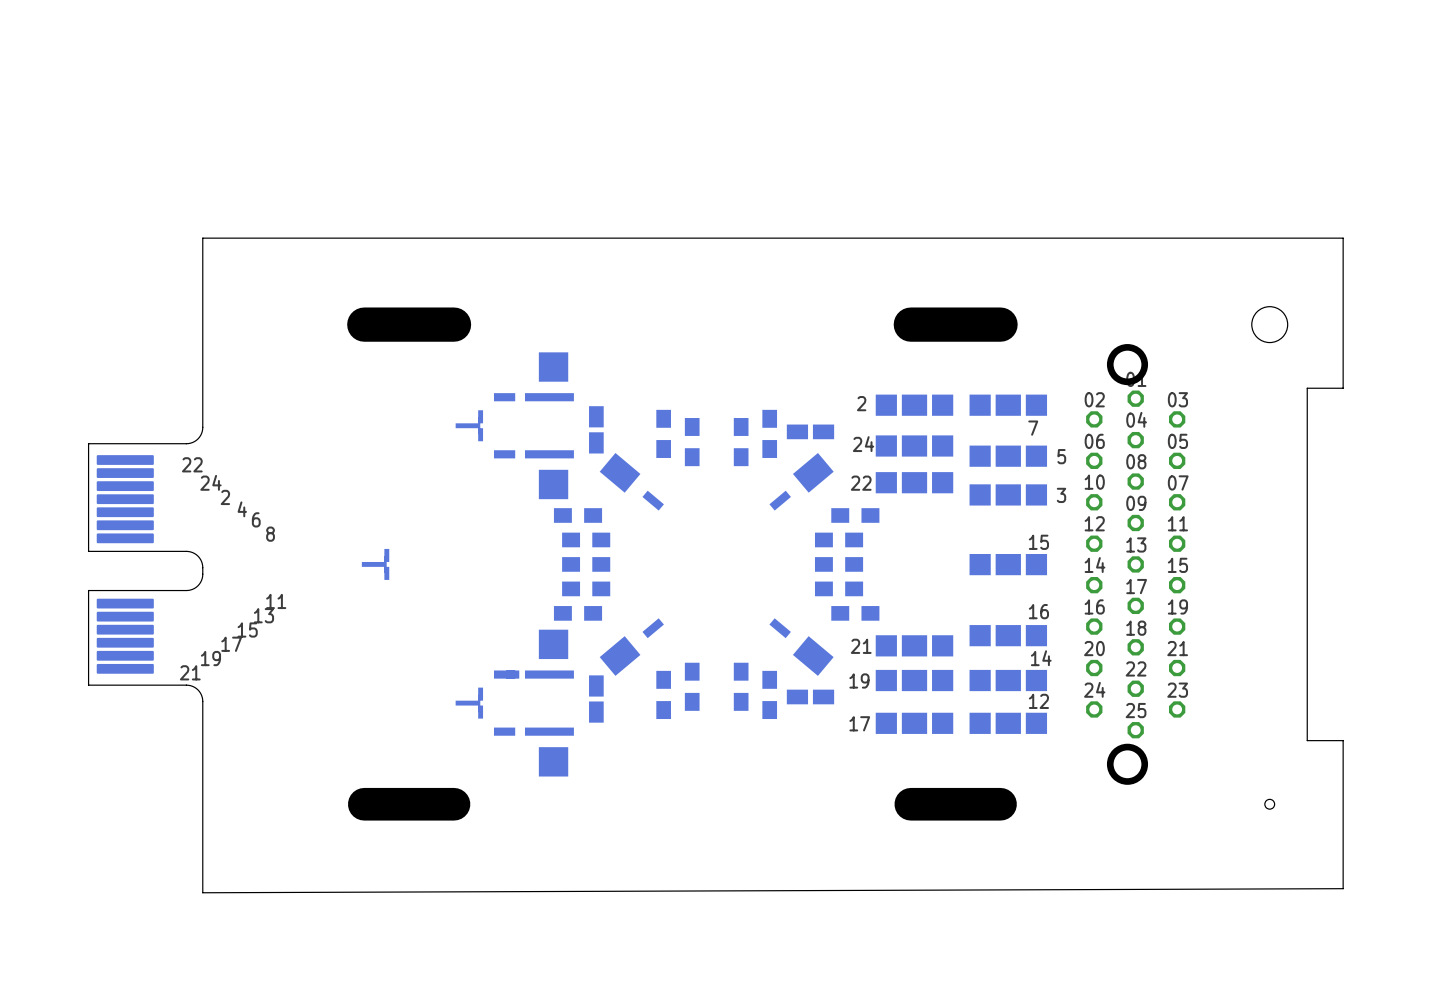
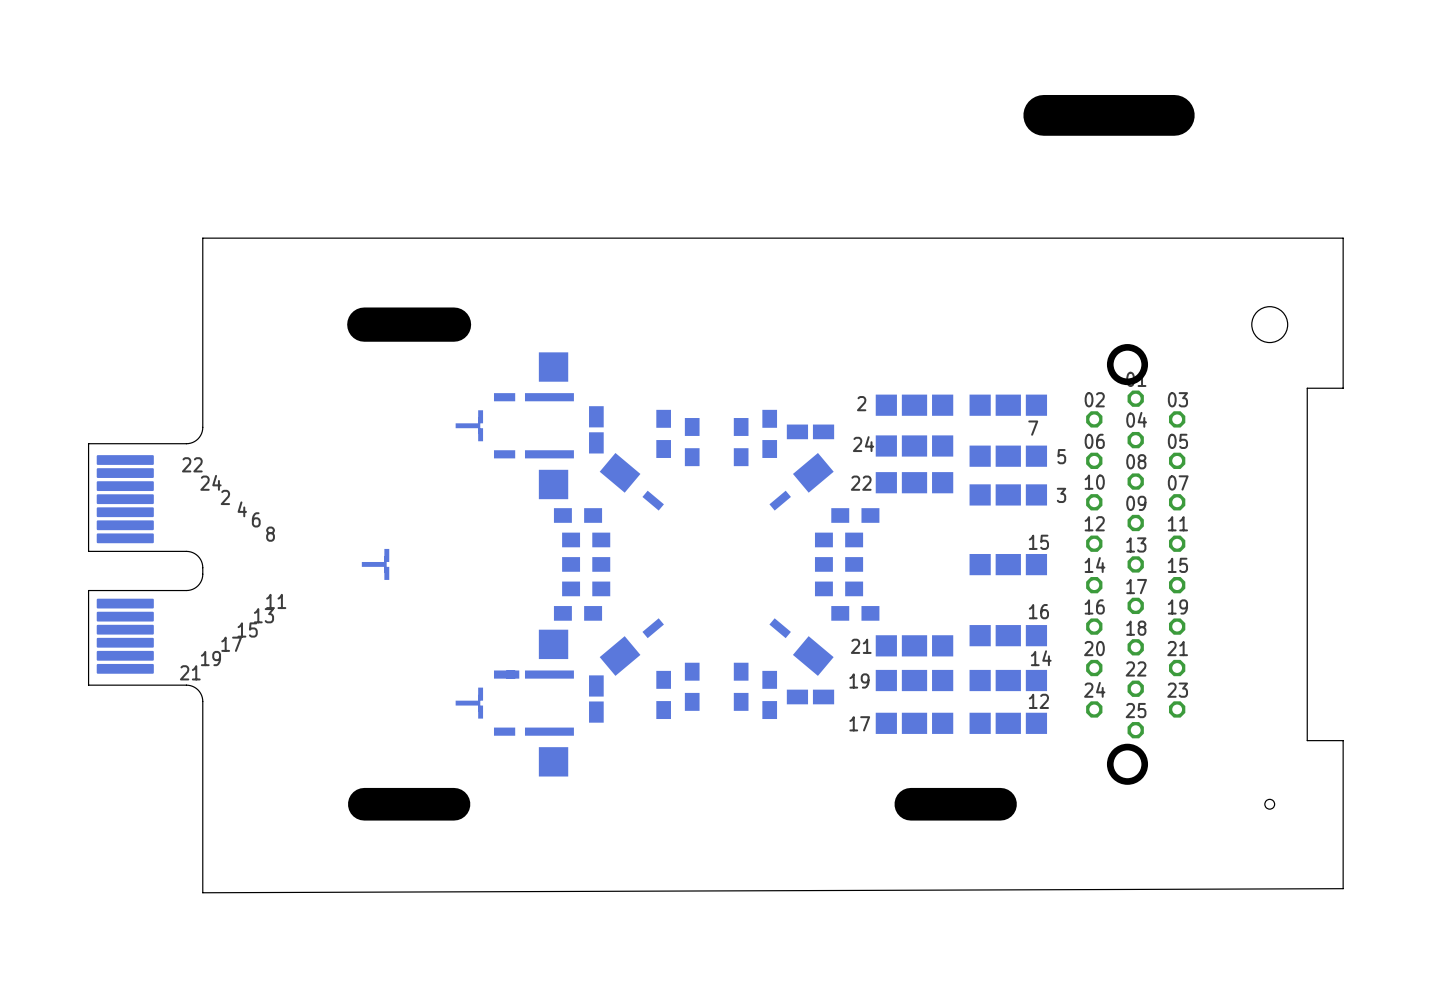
board edge: none -> (1174, 115) (1043, 115)
board edge: (1000, 324) (910, 324) -> none

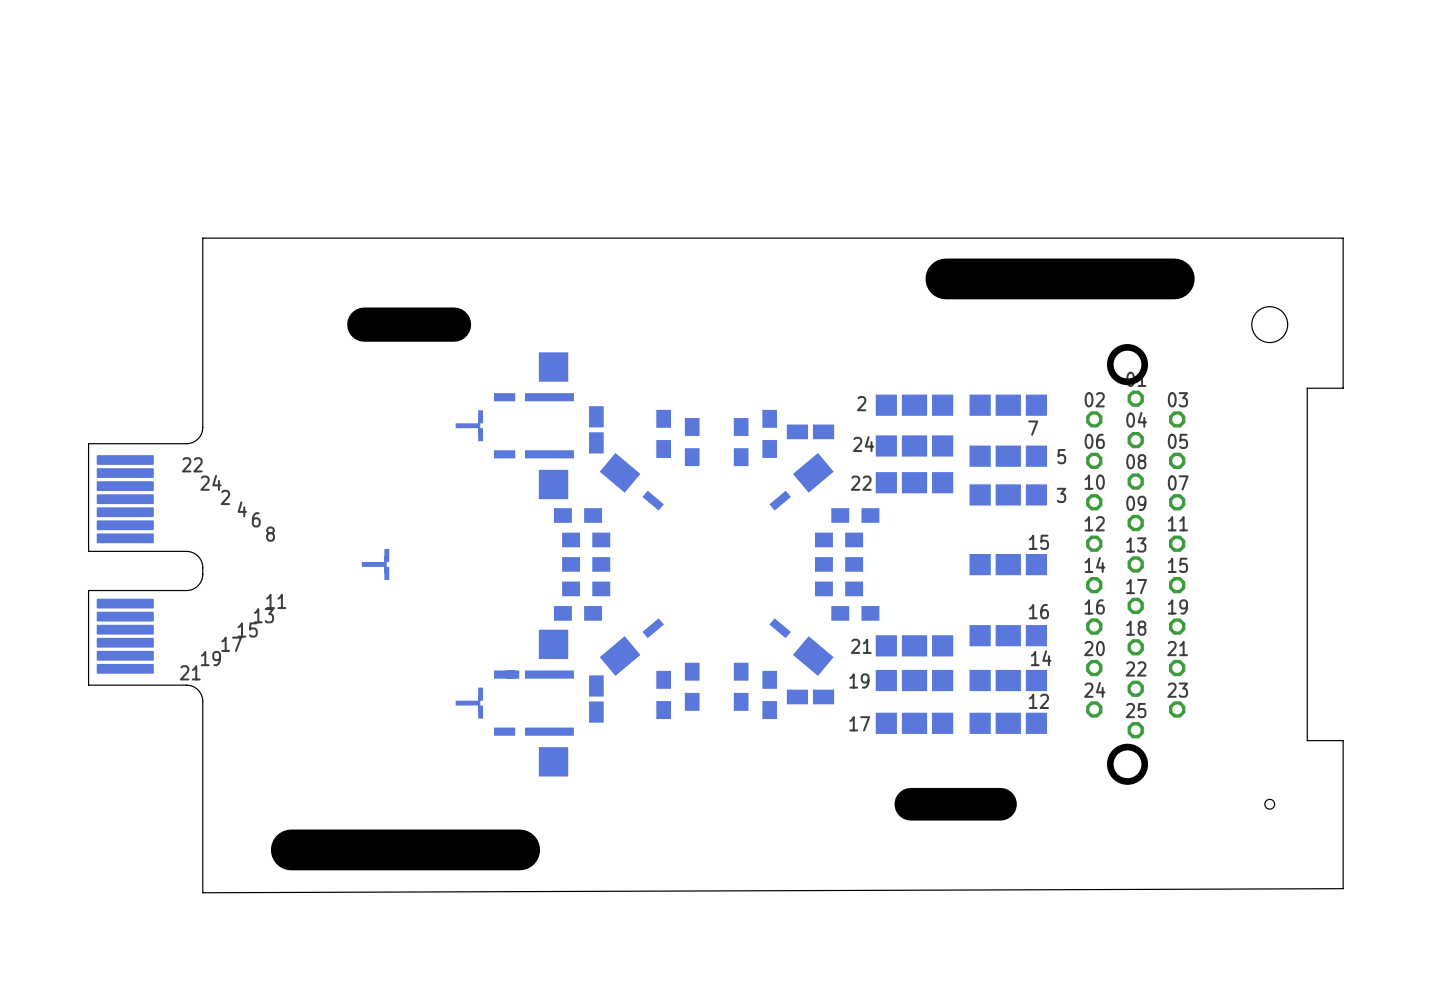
board edge: (1174, 115) (1043, 115) -> none
board edge: none -> (1174, 278) (945, 278)
board edge: (454, 804) (364, 804) -> none
board edge: none -> (519, 849) (291, 849)

